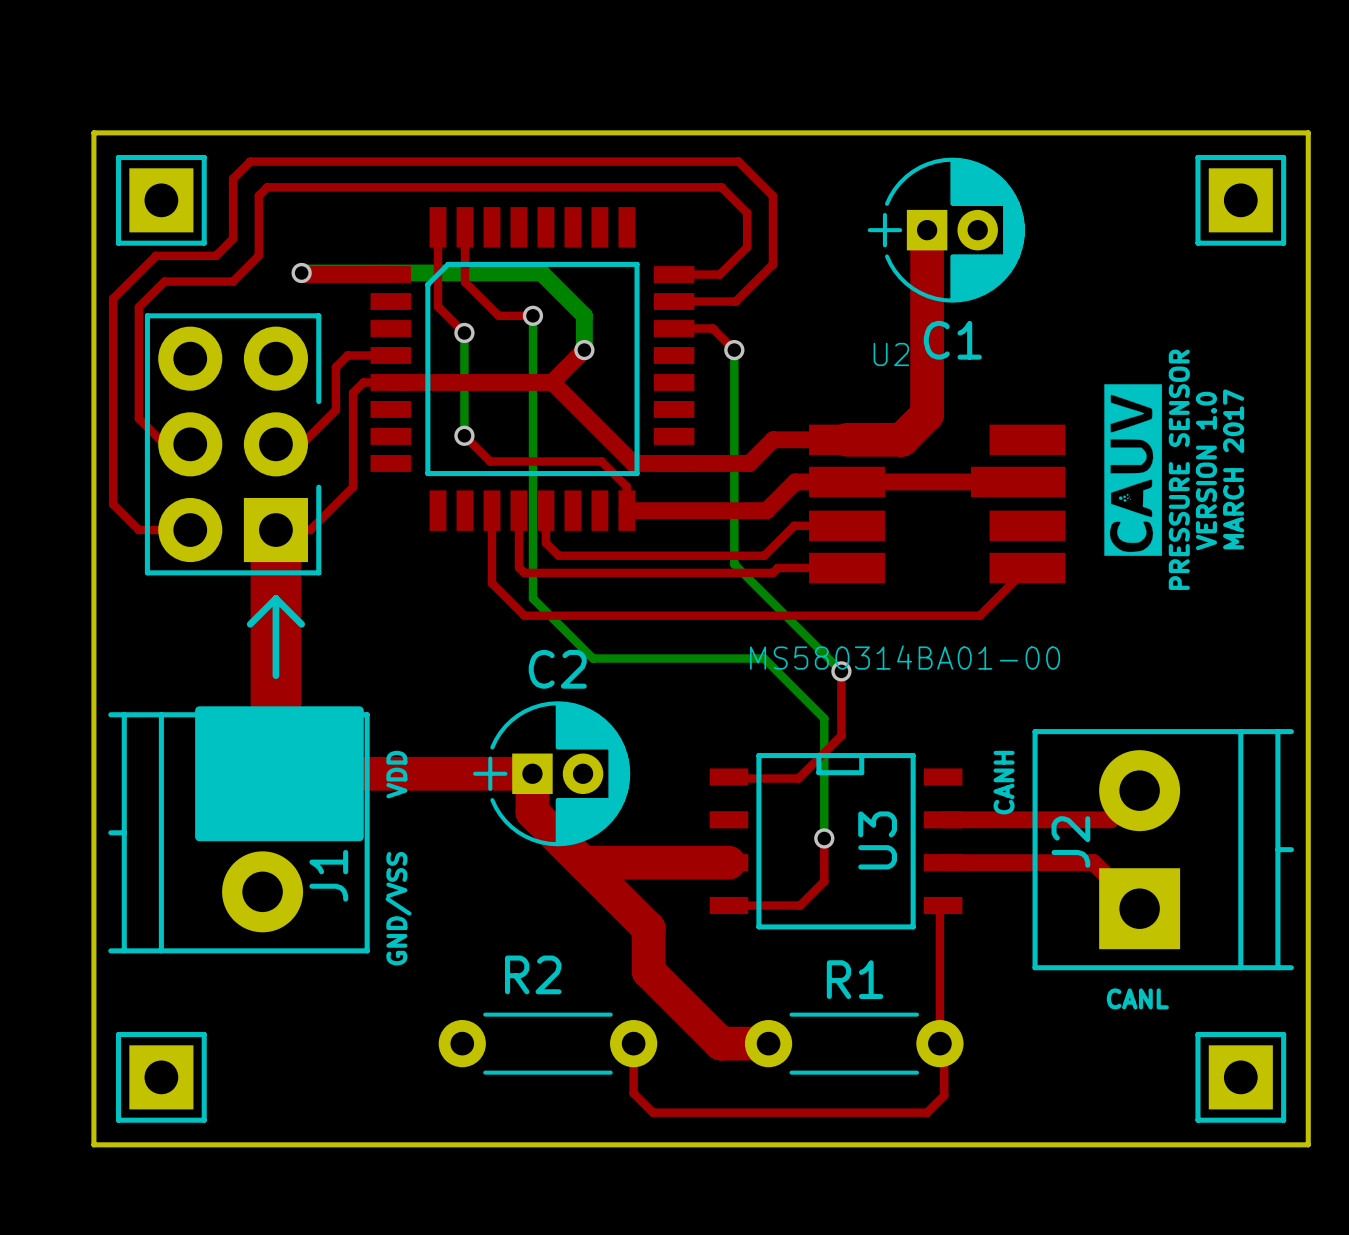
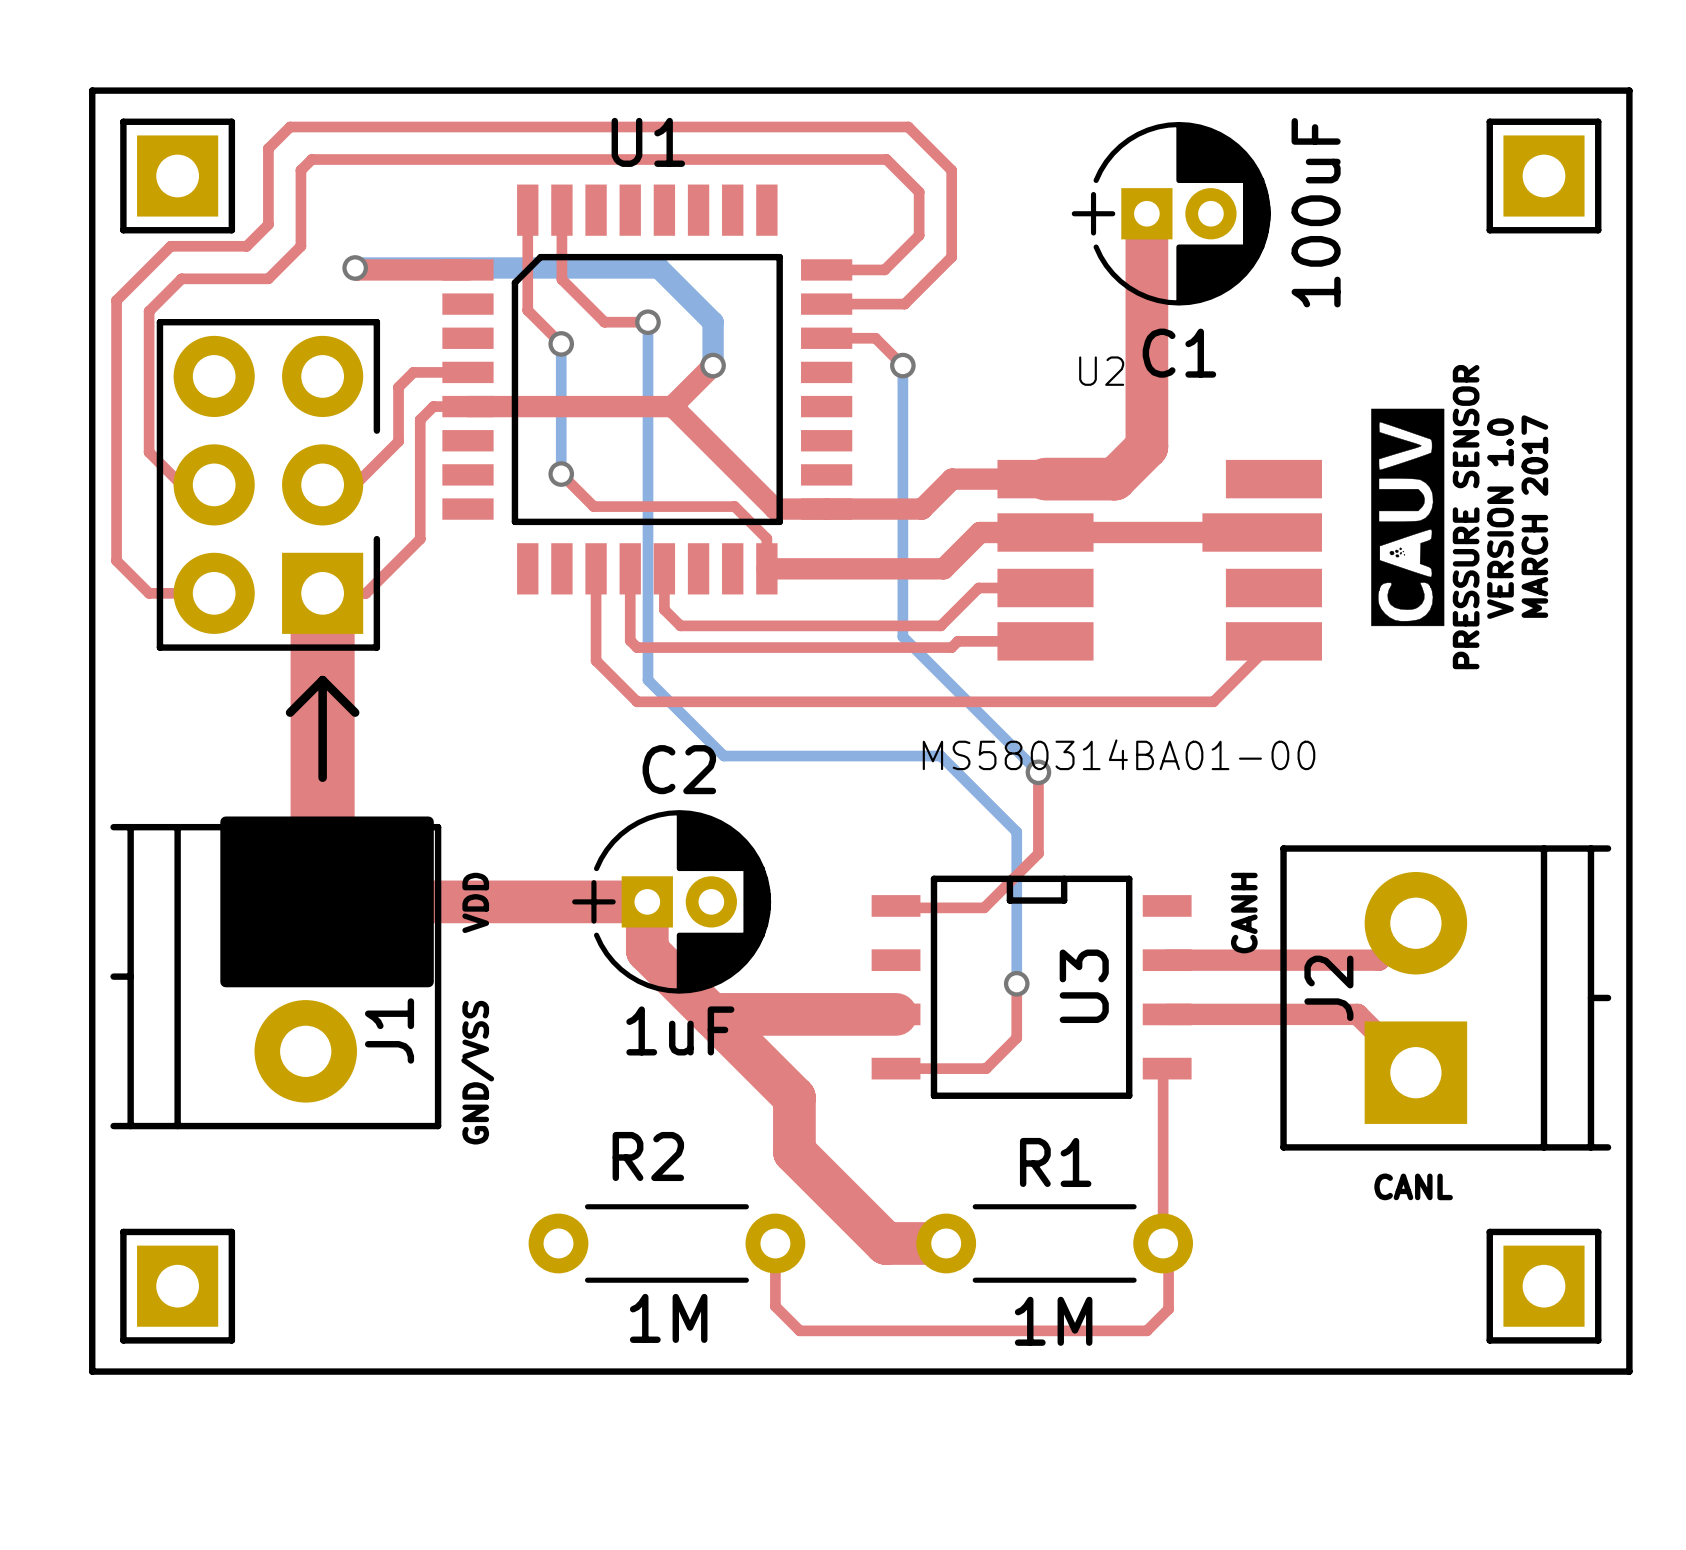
U1 name: none -> U1 (648, 142)
C1 value: none -> 100uF (1316, 212)
C2 value: none -> 1uF (680, 1030)
R2 value: none -> 1M (668, 1318)
R1 value: none -> 1M (1053, 1321)

